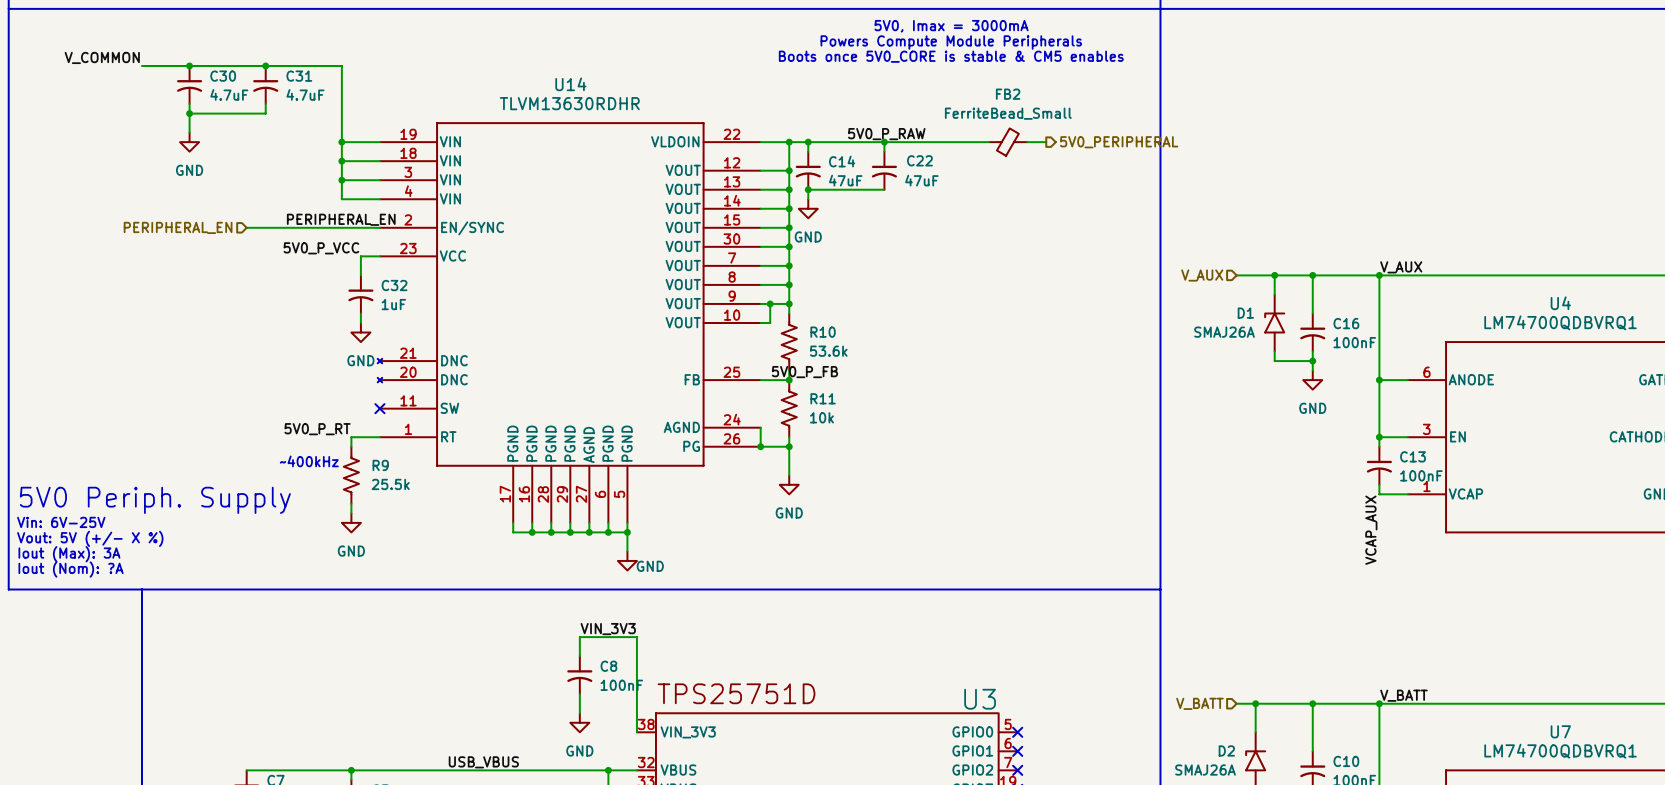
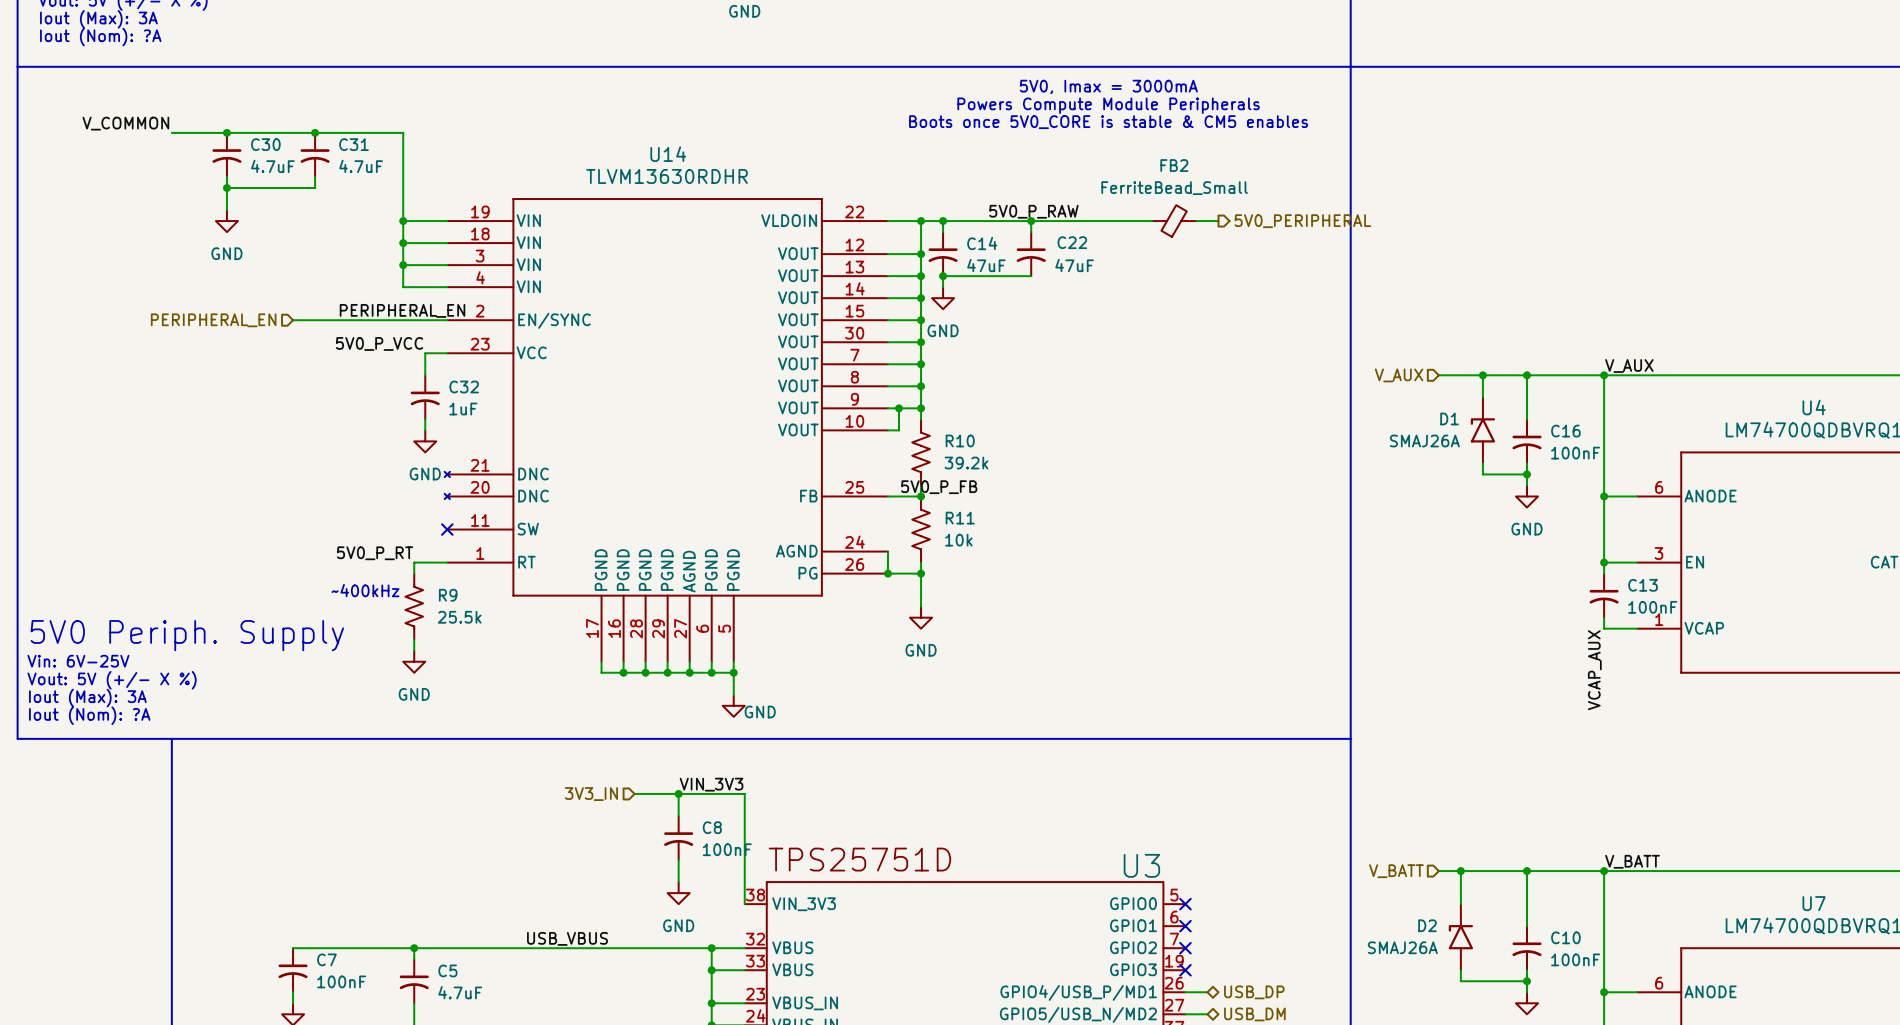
R10 value: 53.6k (828, 351) -> 39.2k (966, 463)
hierarchical label: none -> 3V3_IN (591, 794)
wire: none -> (634, 793) (678, 793)
junction: none -> (678, 793)

